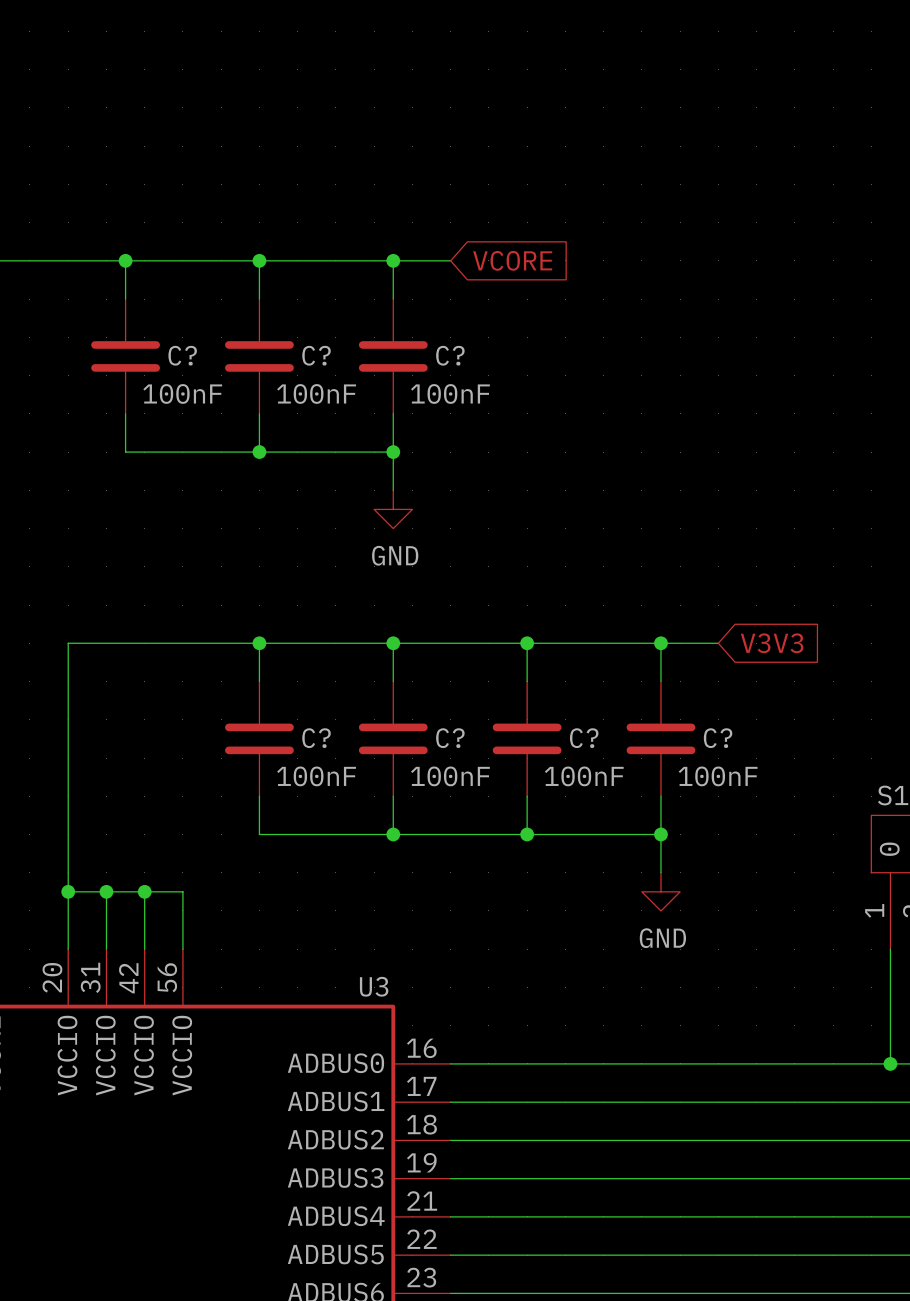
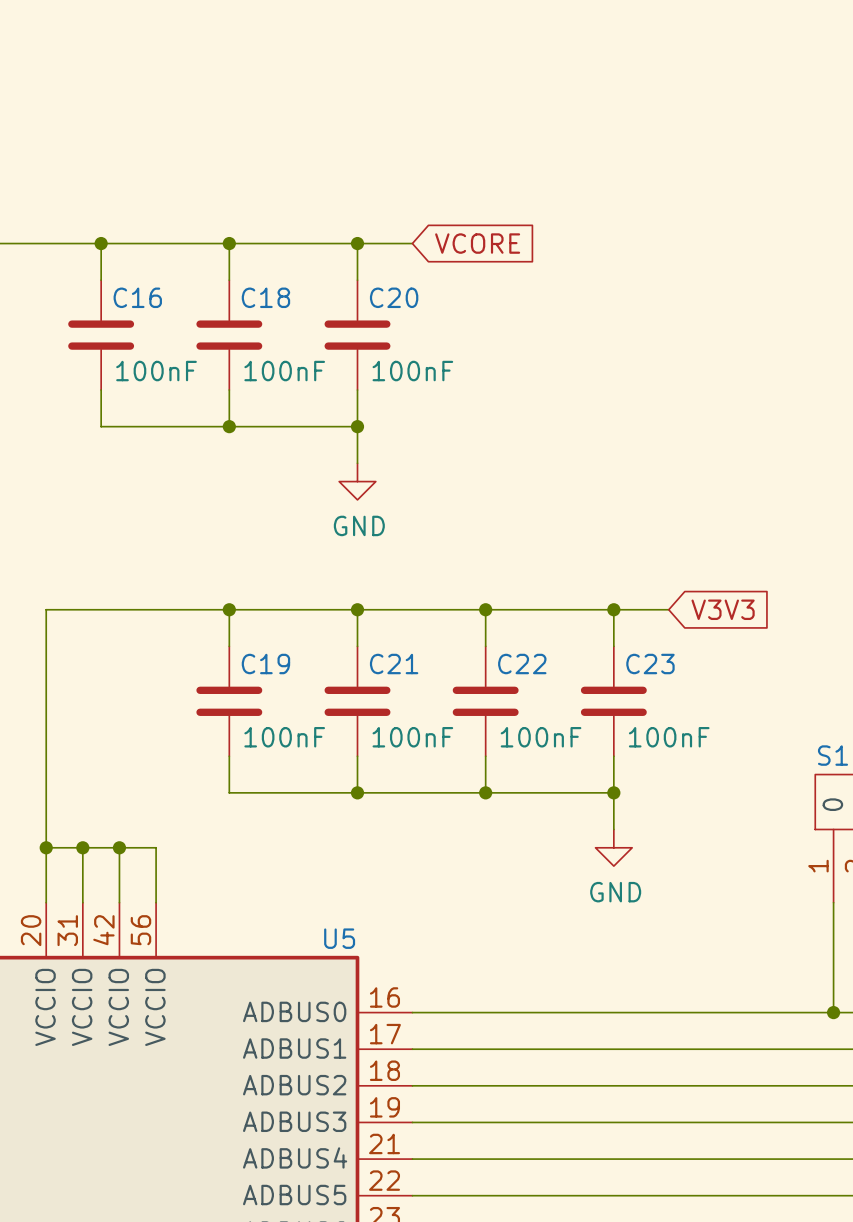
C? name: C? (182, 355) -> C16 (137, 297)
C? name: C? (316, 355) -> C18 (265, 297)
C? name: C? (450, 355) -> C20 (394, 297)
C? name: C? (316, 738) -> C19 (265, 664)
C? name: C? (450, 738) -> C21 (394, 664)
C? name: C? (584, 738) -> C22 (522, 664)
C? name: C? (718, 738) -> C23 (650, 664)
U3 name: U3 (374, 986) -> U5 (339, 938)

